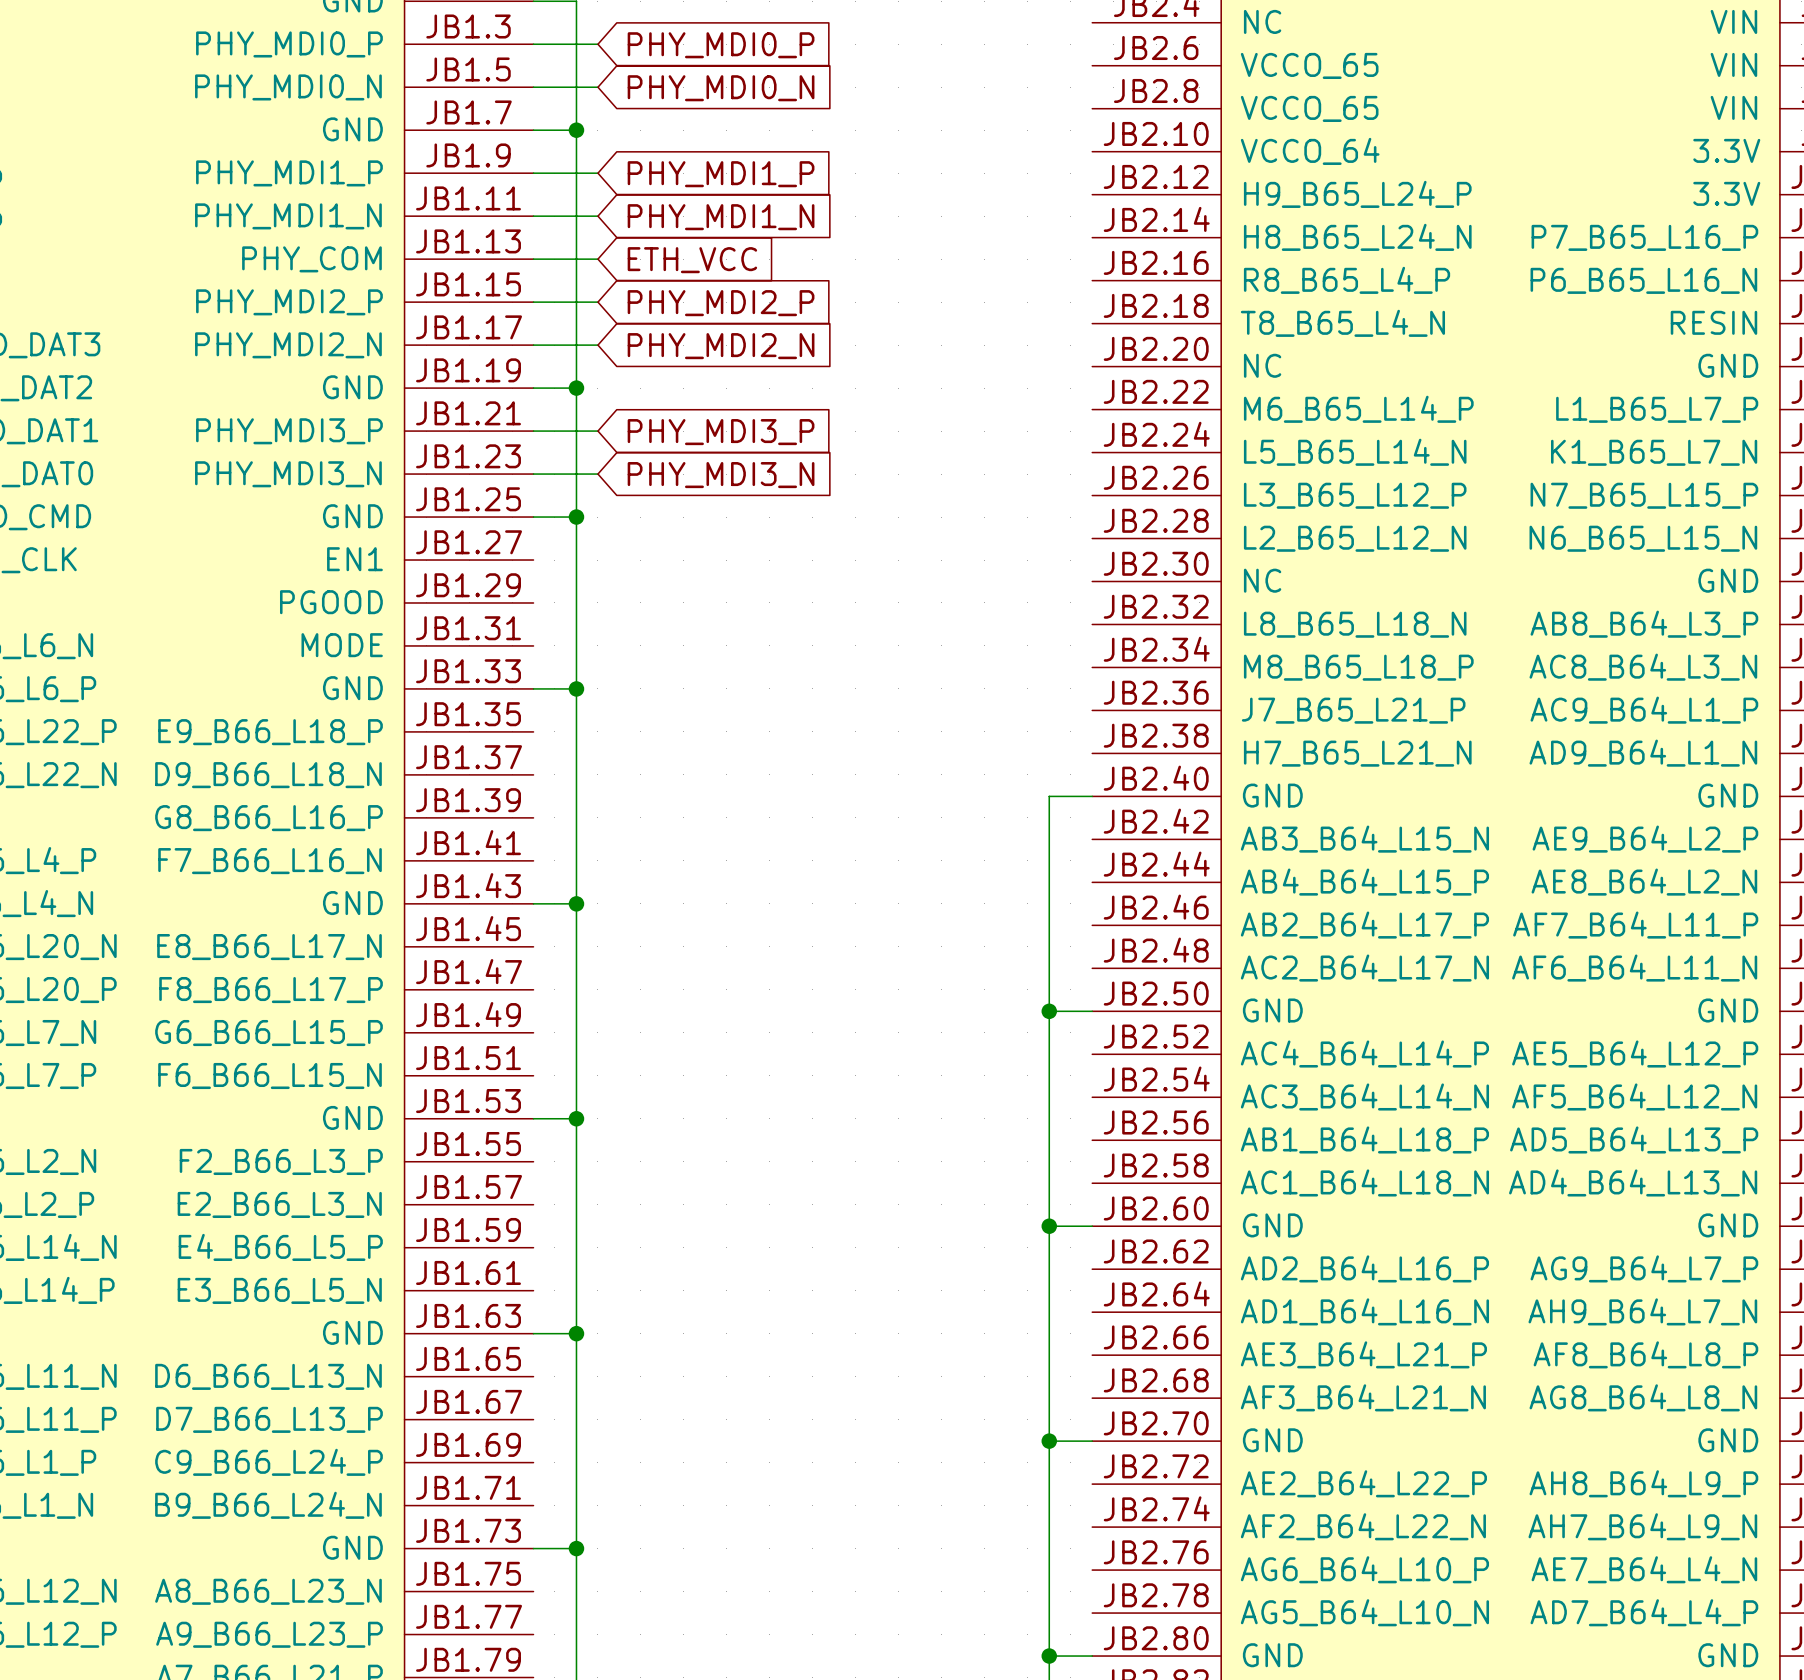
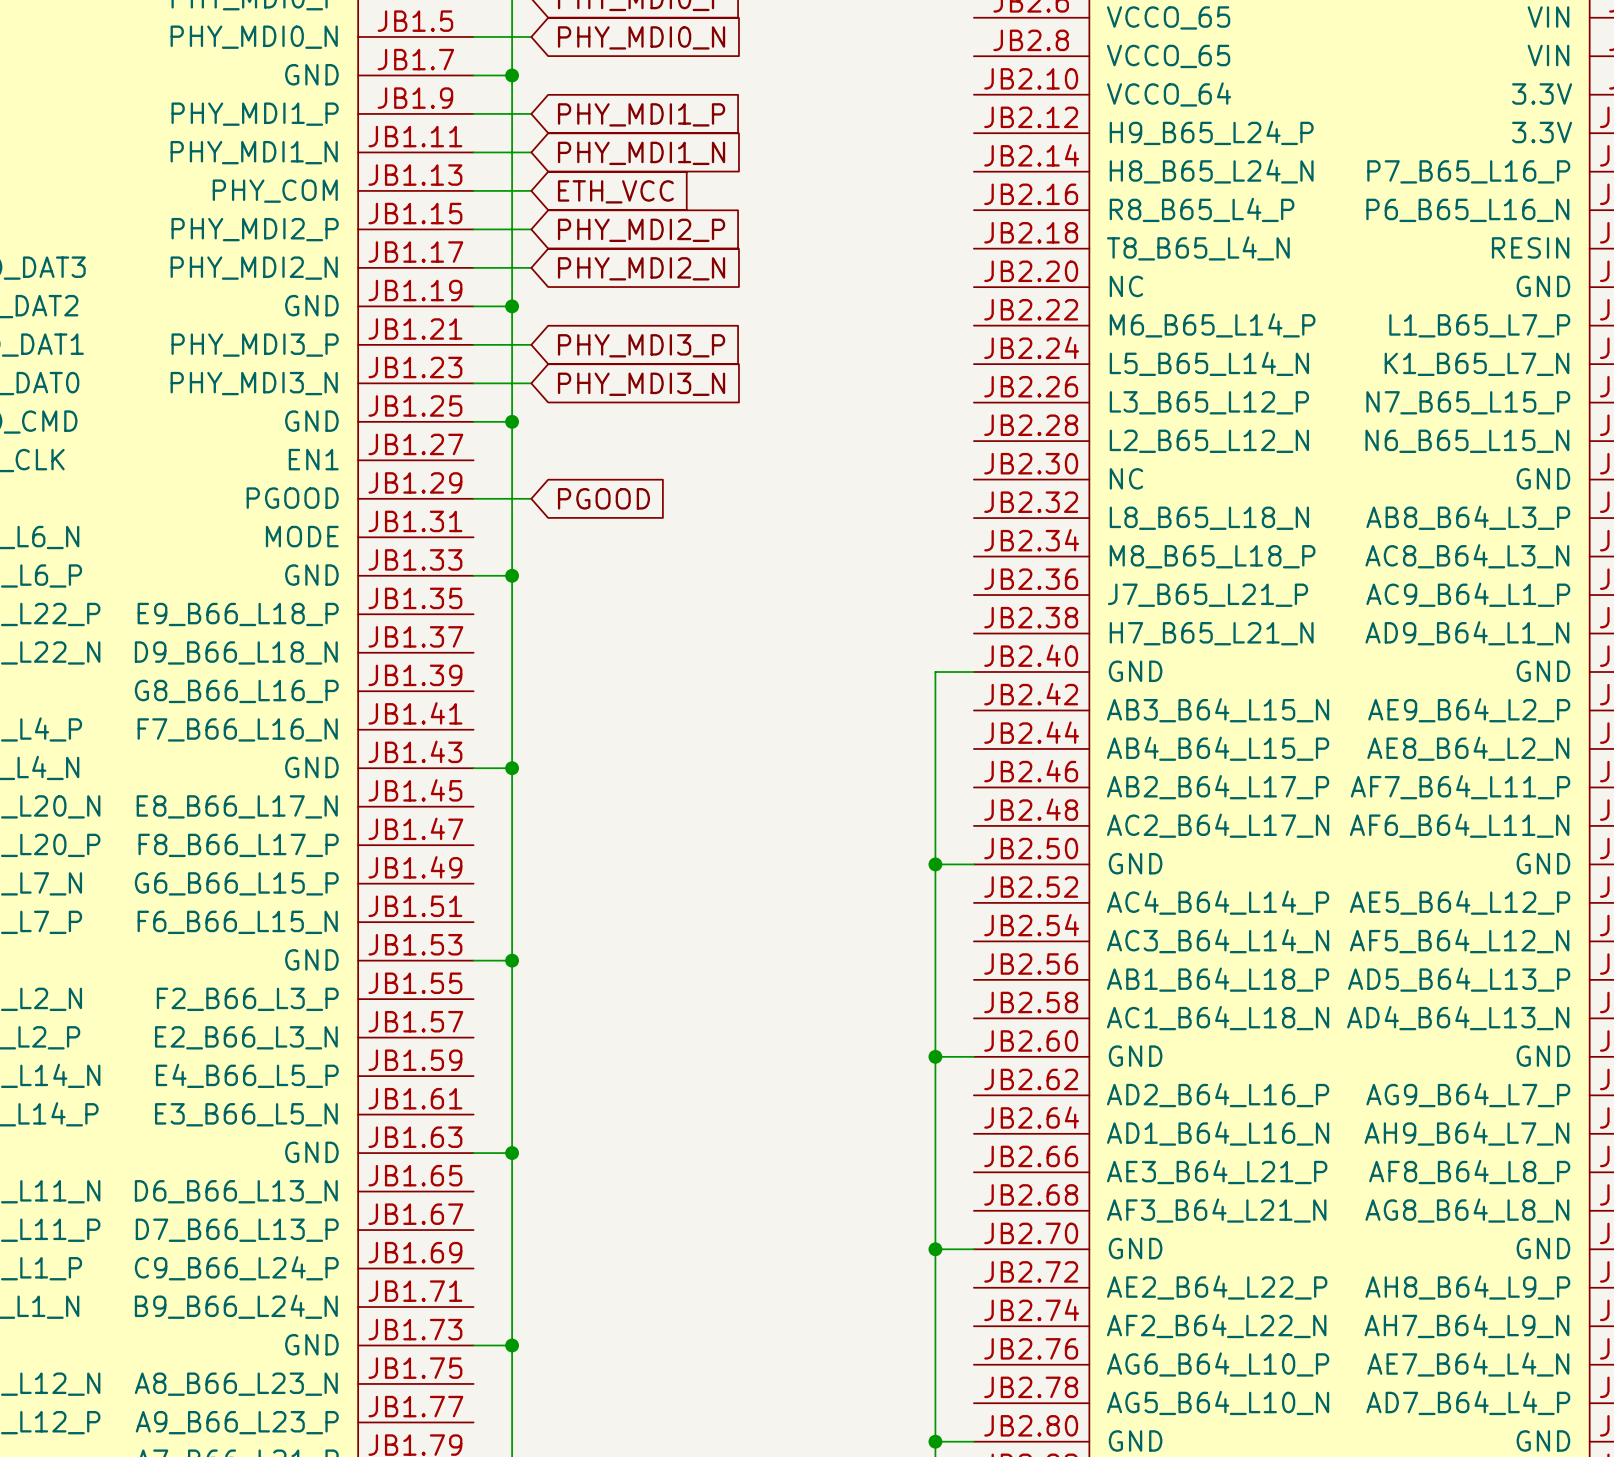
wire: none -> (473, 498) (531, 498)
global label: none -> PGOOD (603, 498)

